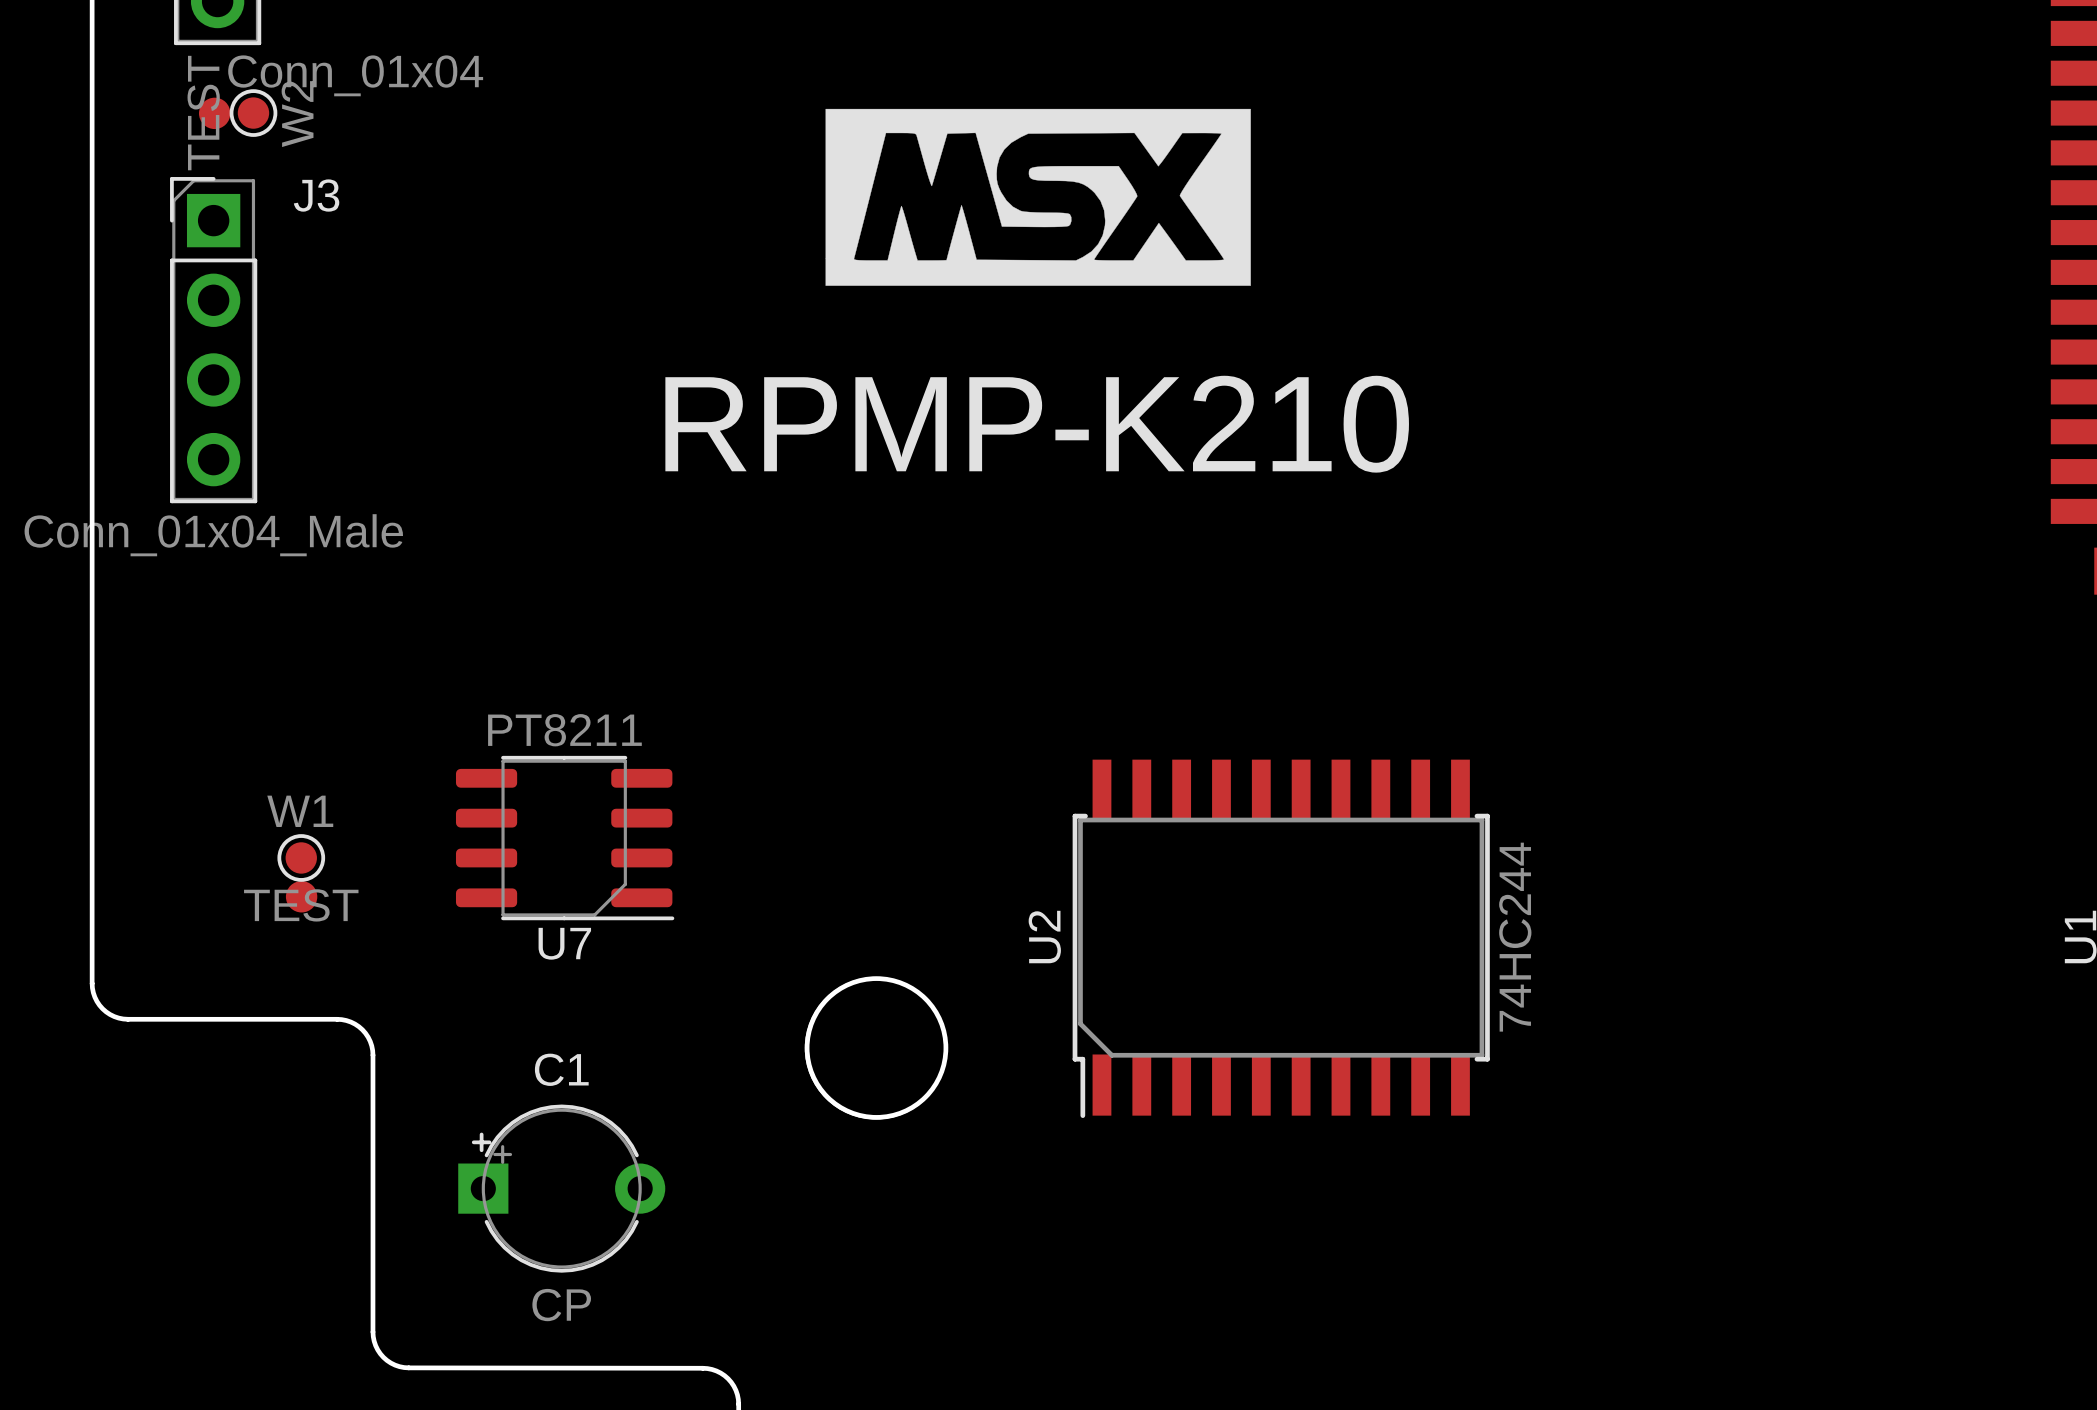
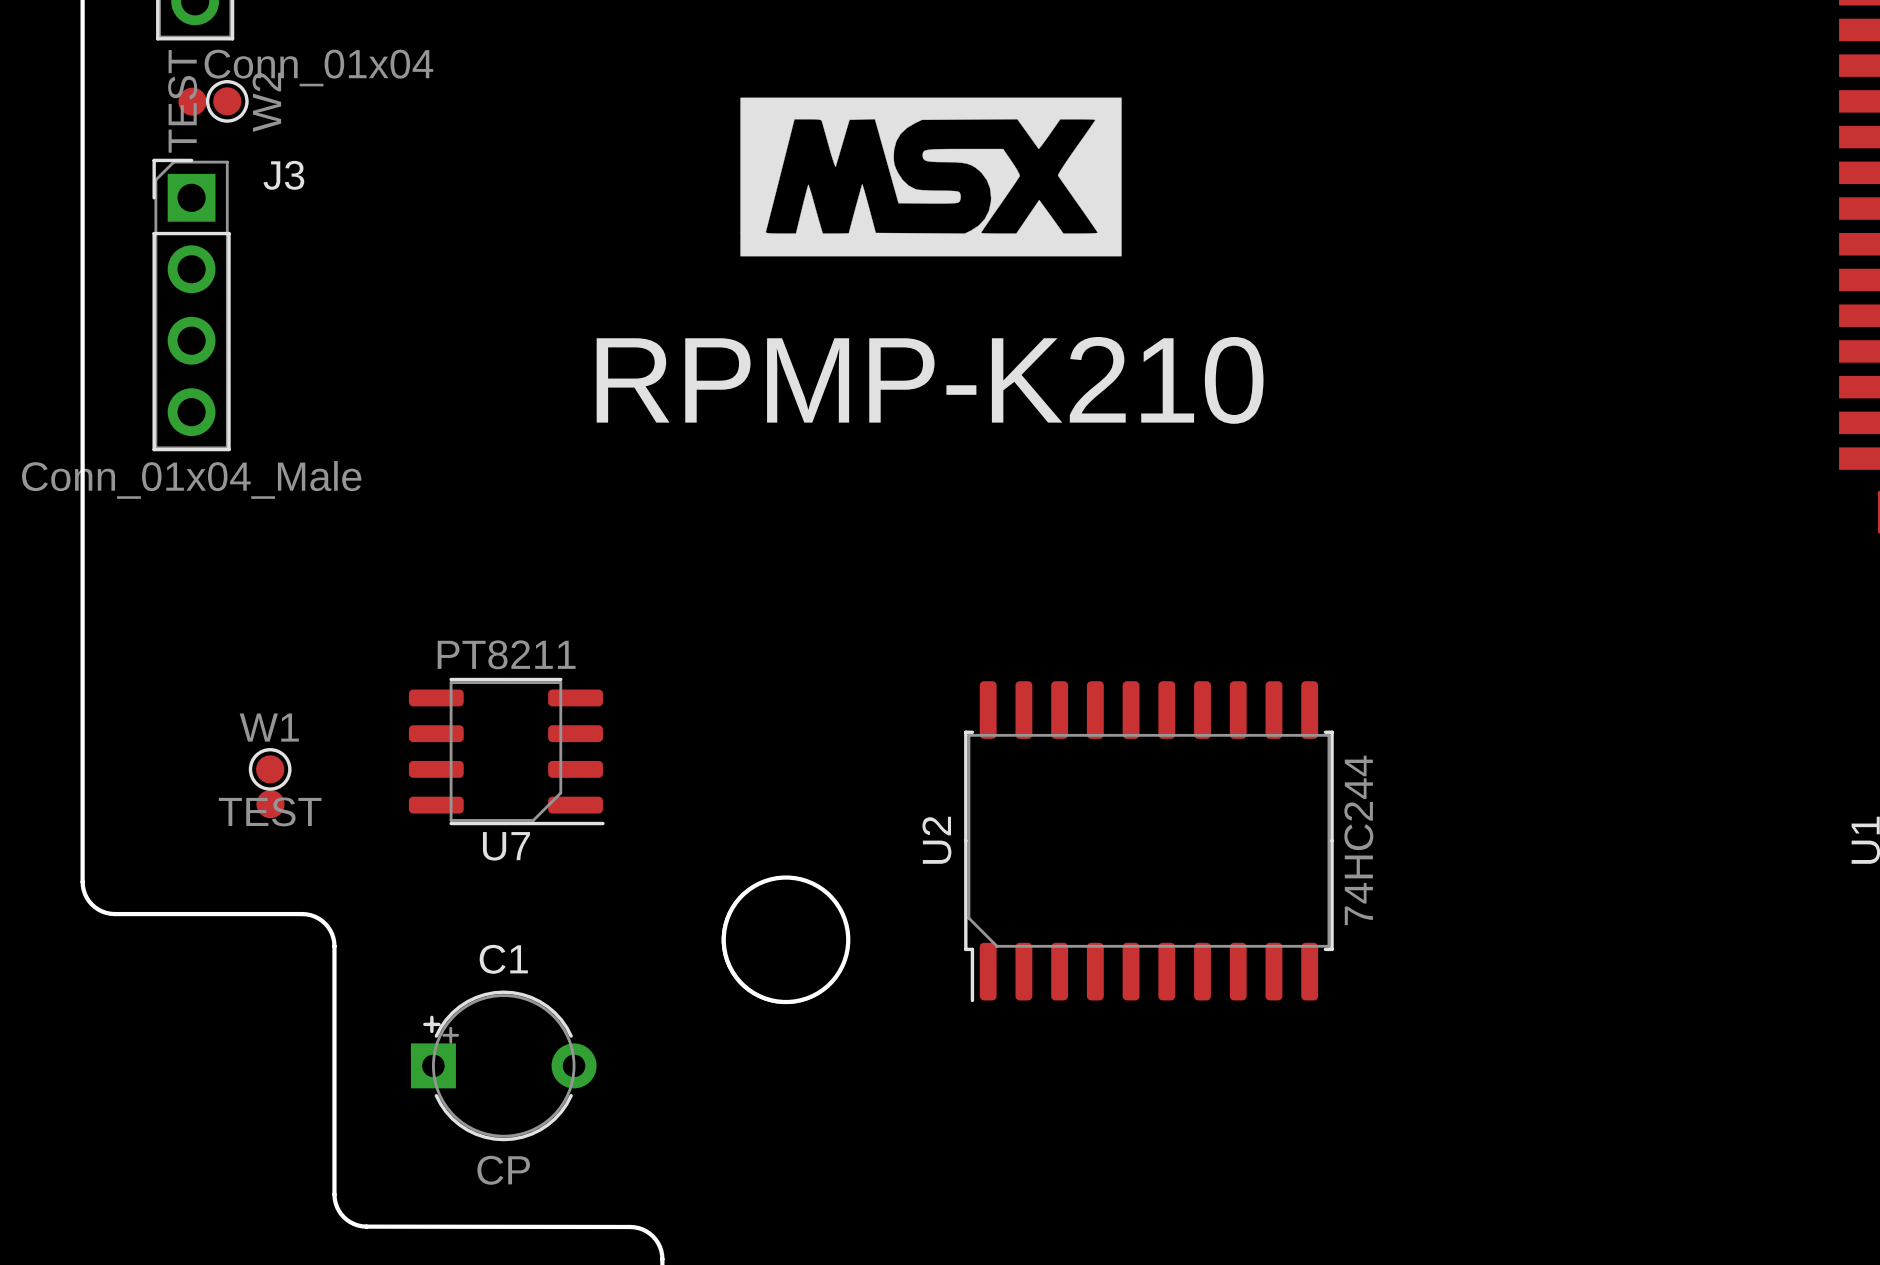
U2 footprint: [1072, 759, 1490, 1119] -> [964, 681, 1334, 1003]

